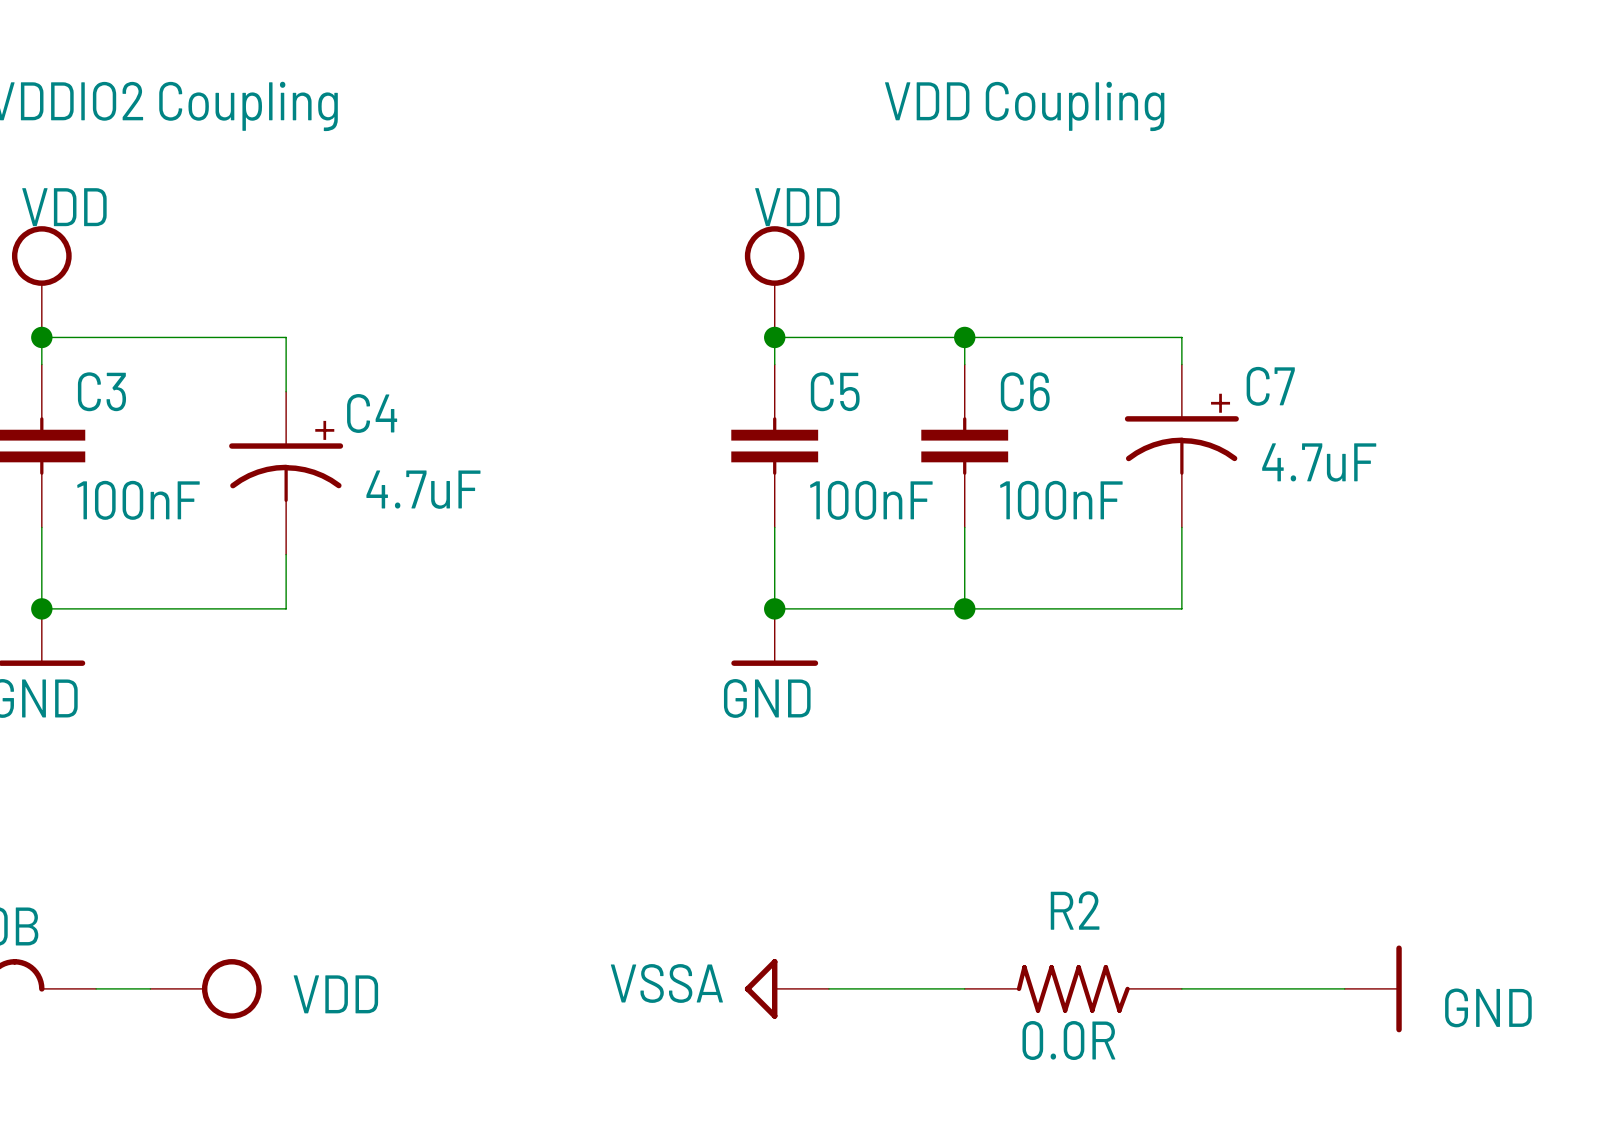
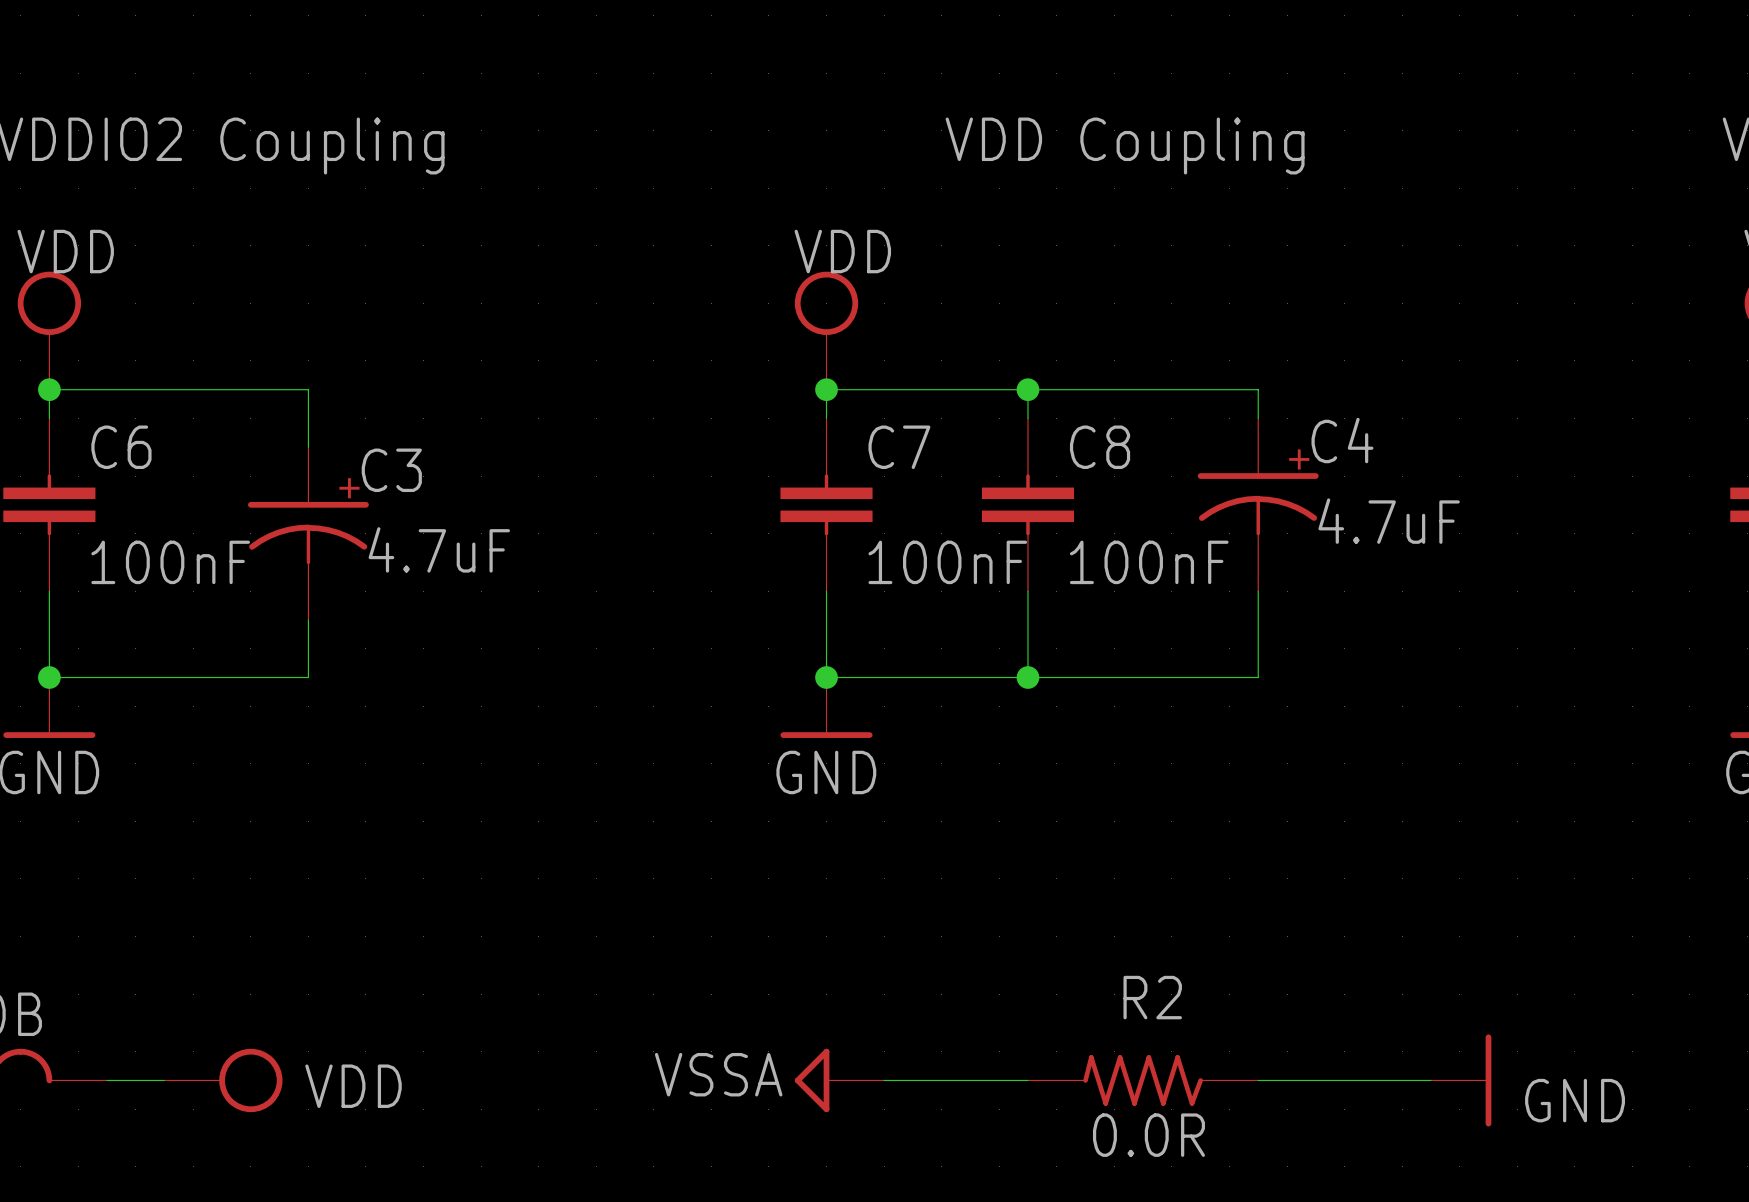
C7 name: C7 (1270, 386) -> C4 (1342, 440)
C3 name: C3 (101, 391) -> C6 (121, 447)
C5 name: C5 (835, 391) -> C7 (899, 447)
C6 name: C6 (1025, 391) -> C8 (1100, 447)
C4 name: C4 (372, 413) -> C3 (391, 470)

